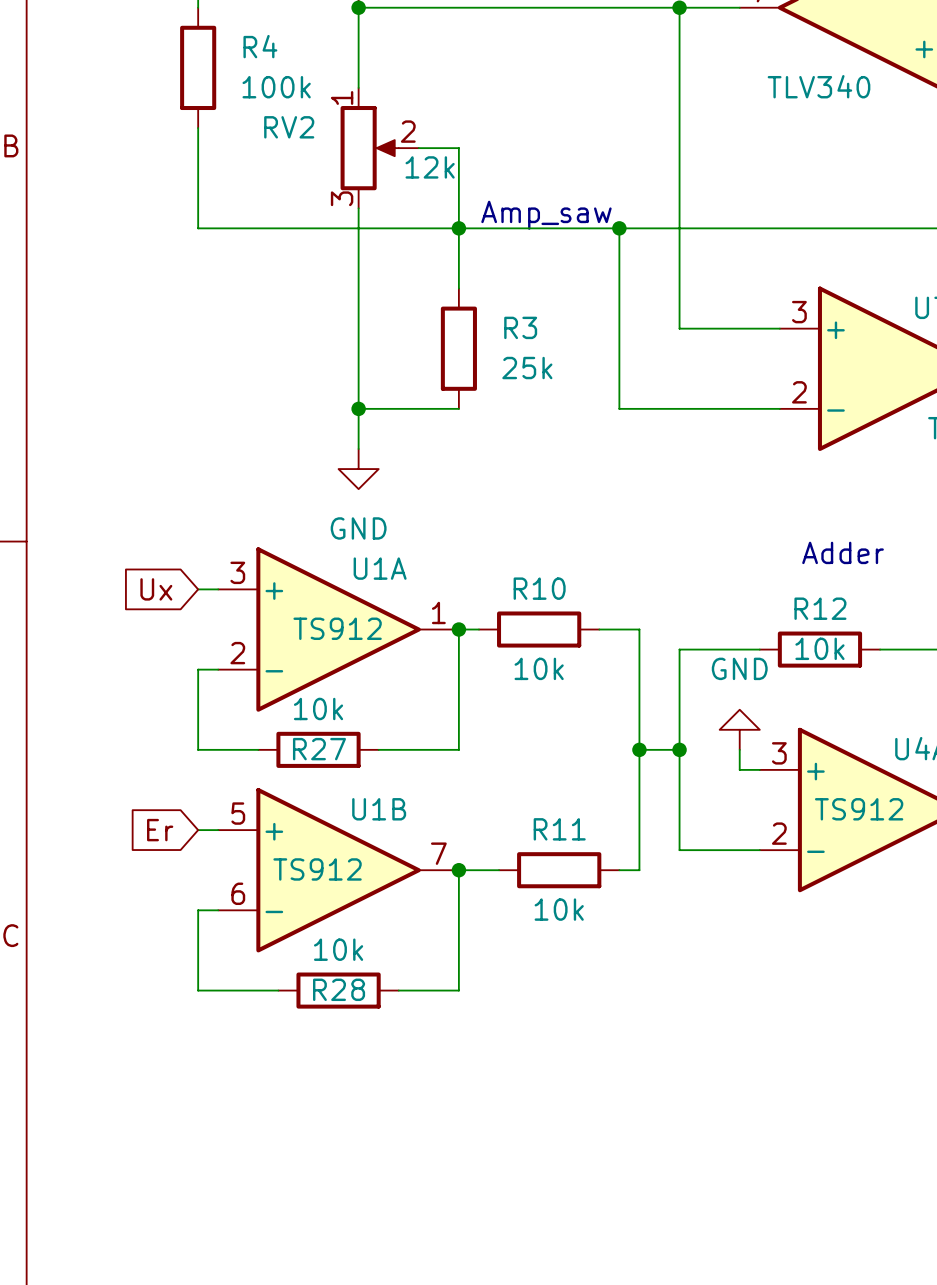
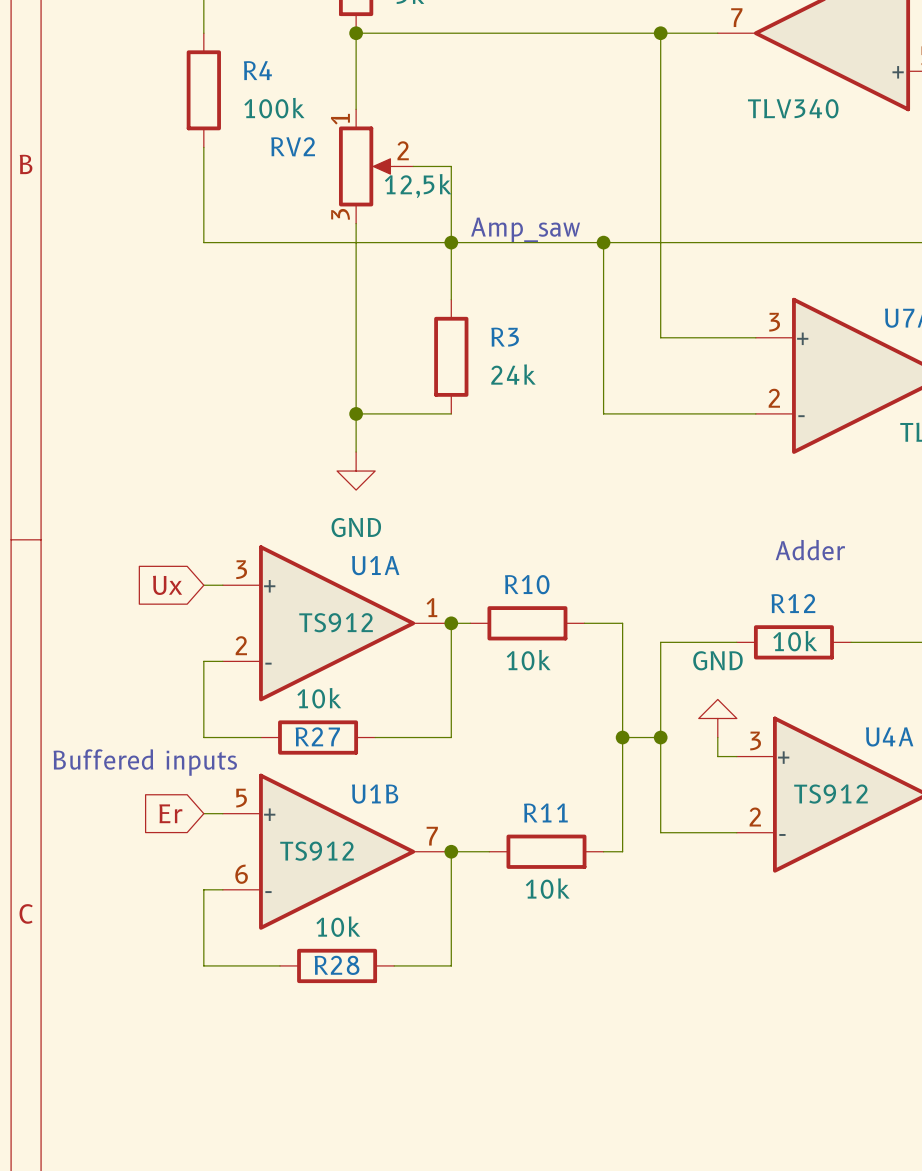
RV2 value: 12k (430, 167) -> 12,5k (418, 186)
R3 value: 25k (527, 368) -> 24k (513, 374)
text: none -> Buffered inputs (145, 762)

